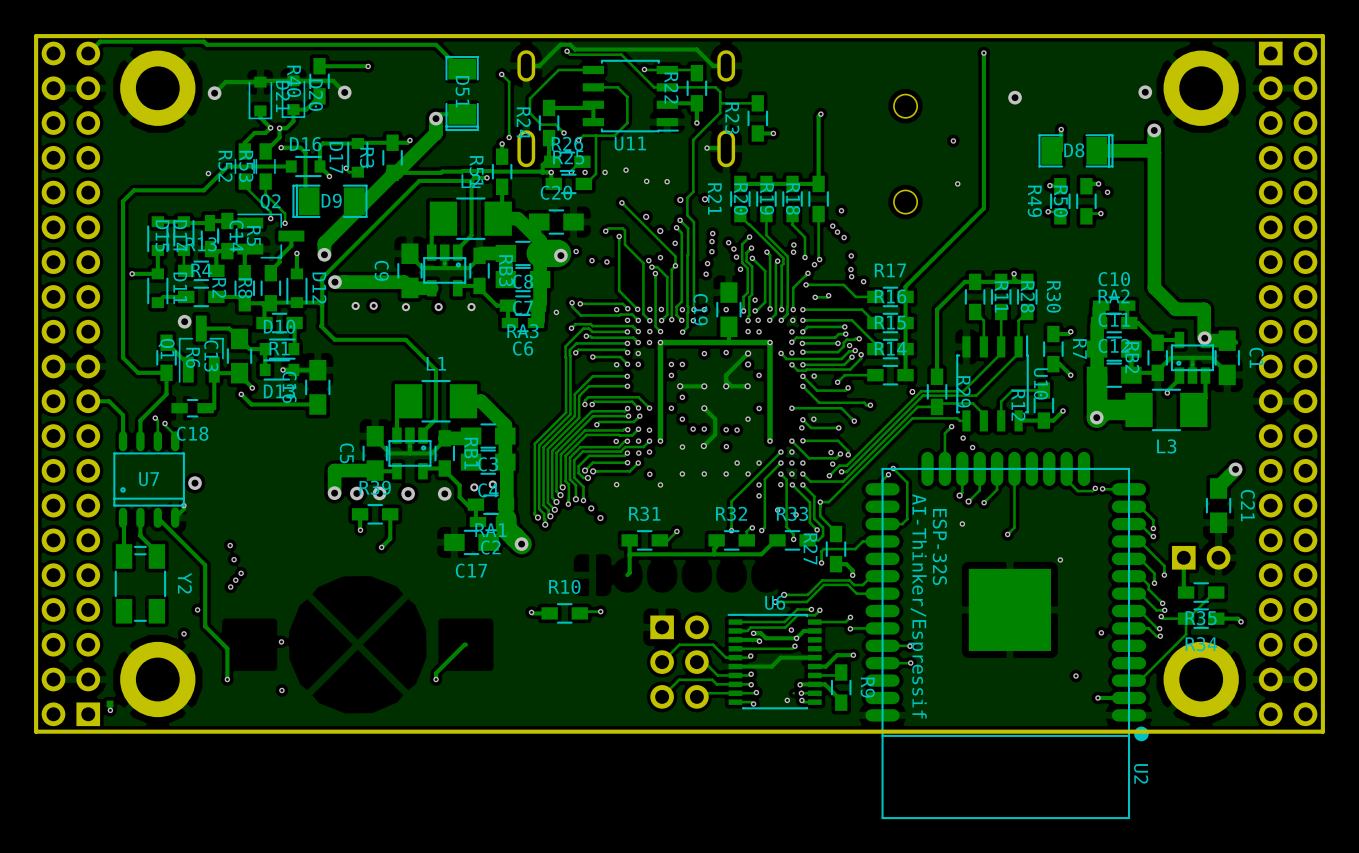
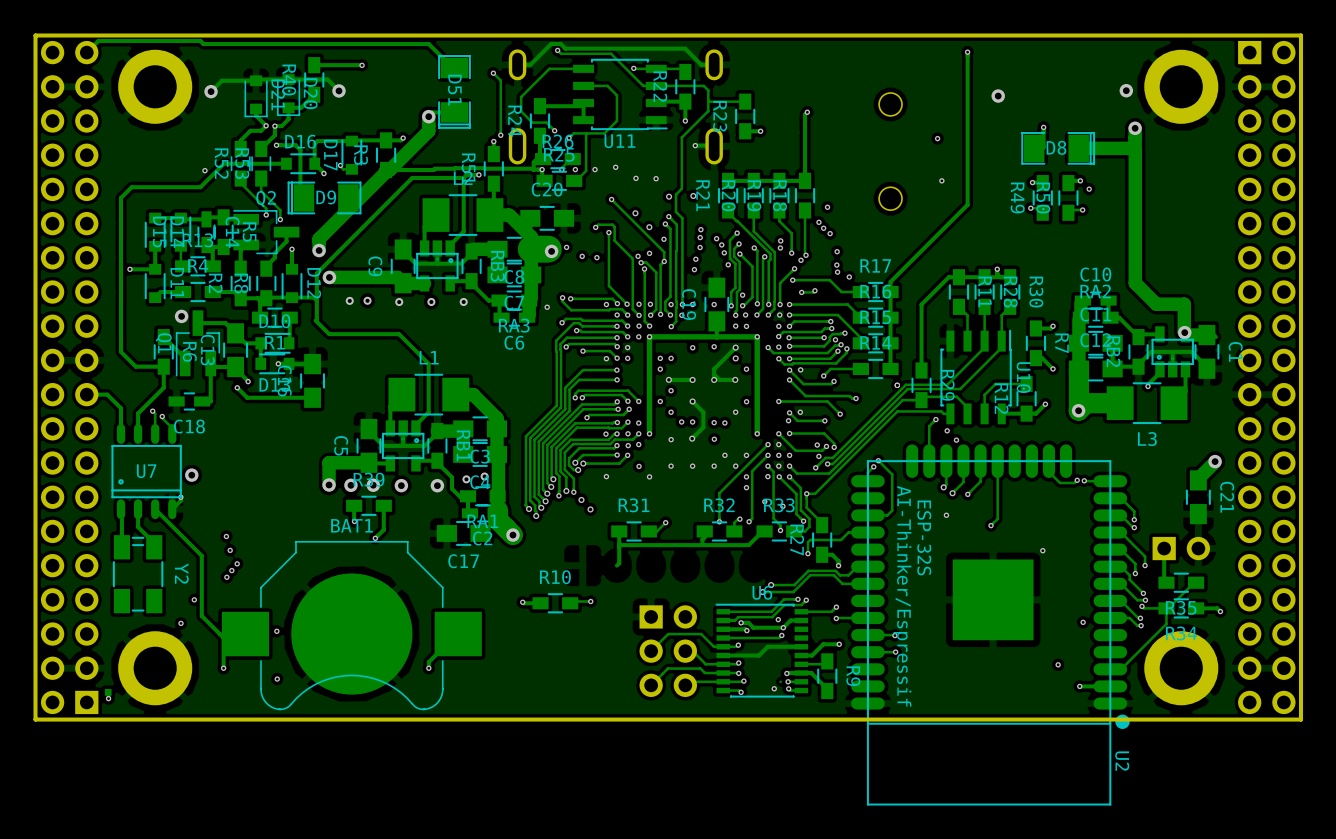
BAT1: none -> (351, 625)

